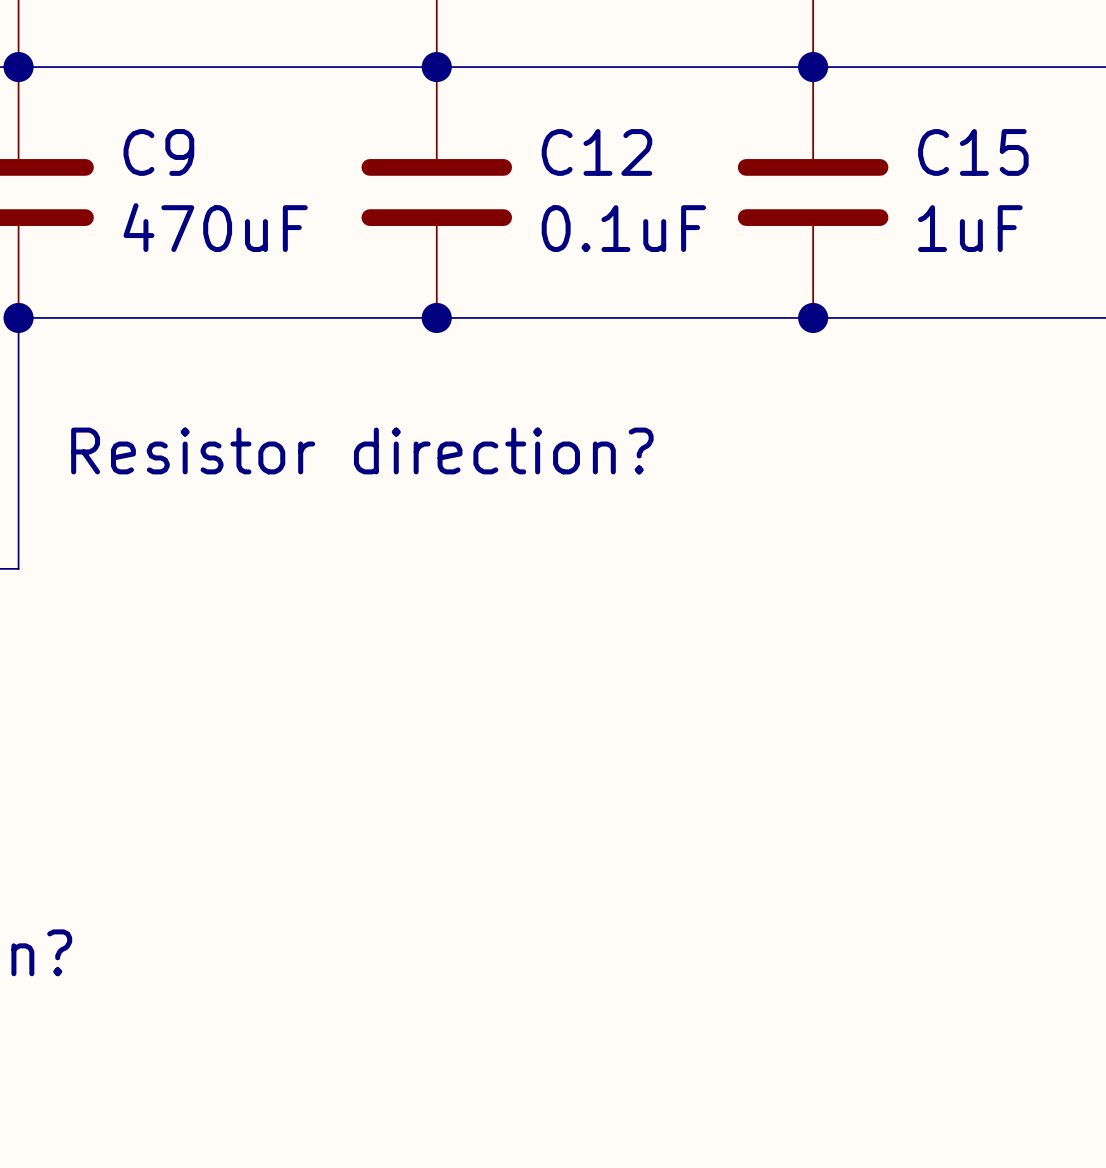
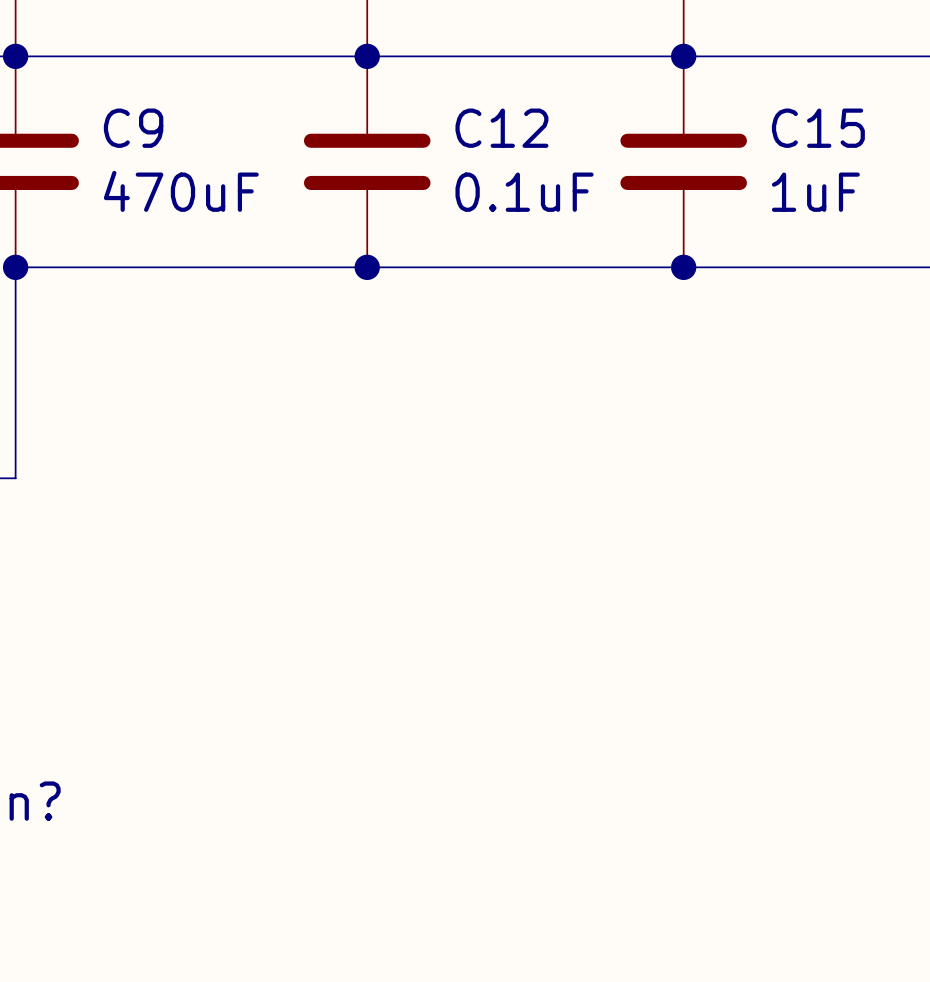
text: Resistor direction? (362, 450) -> none

